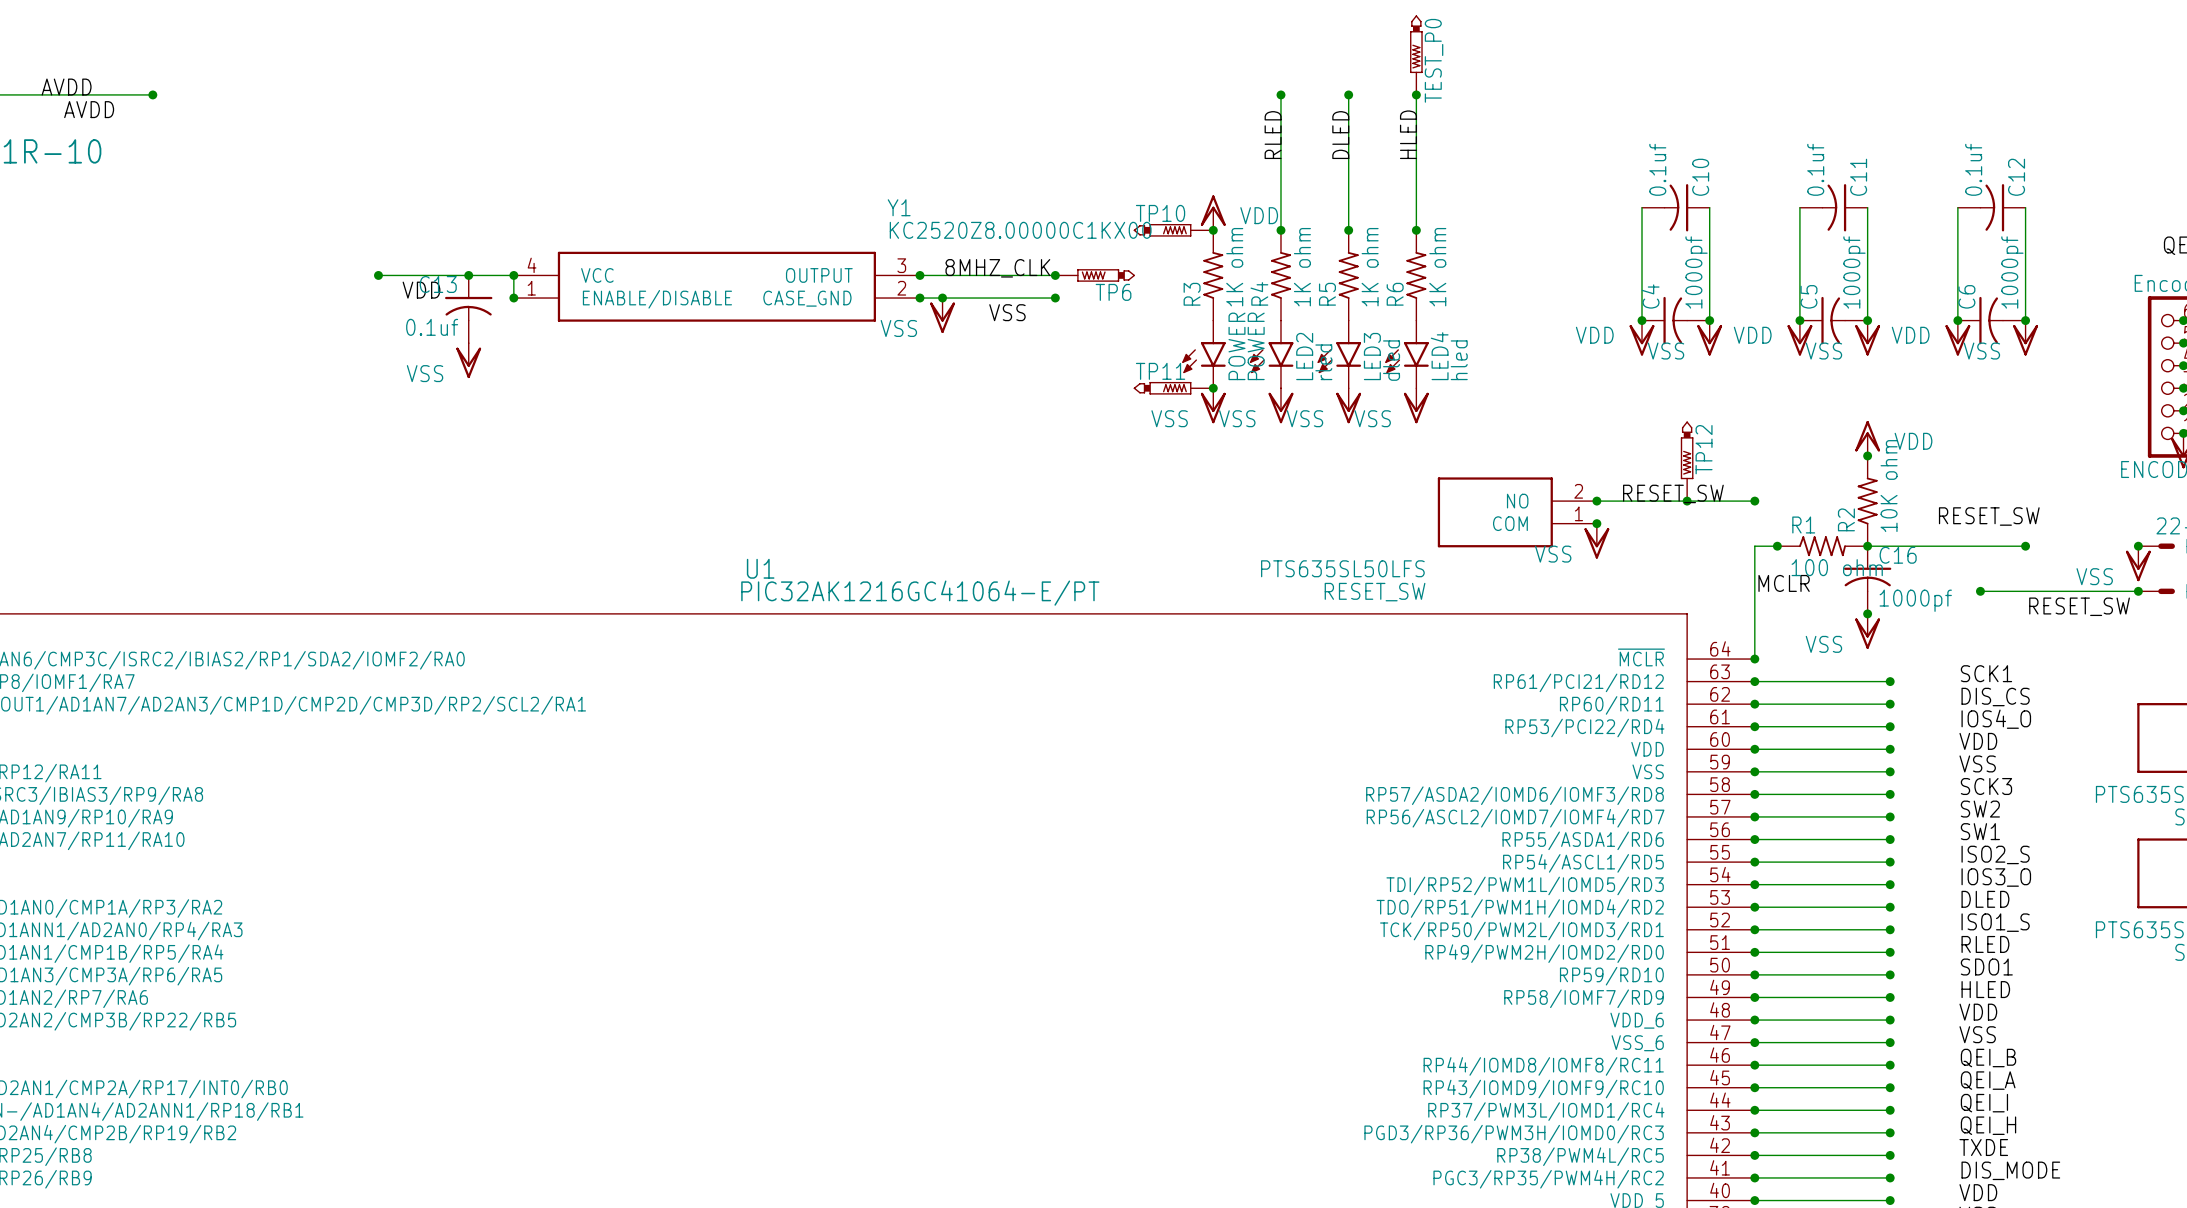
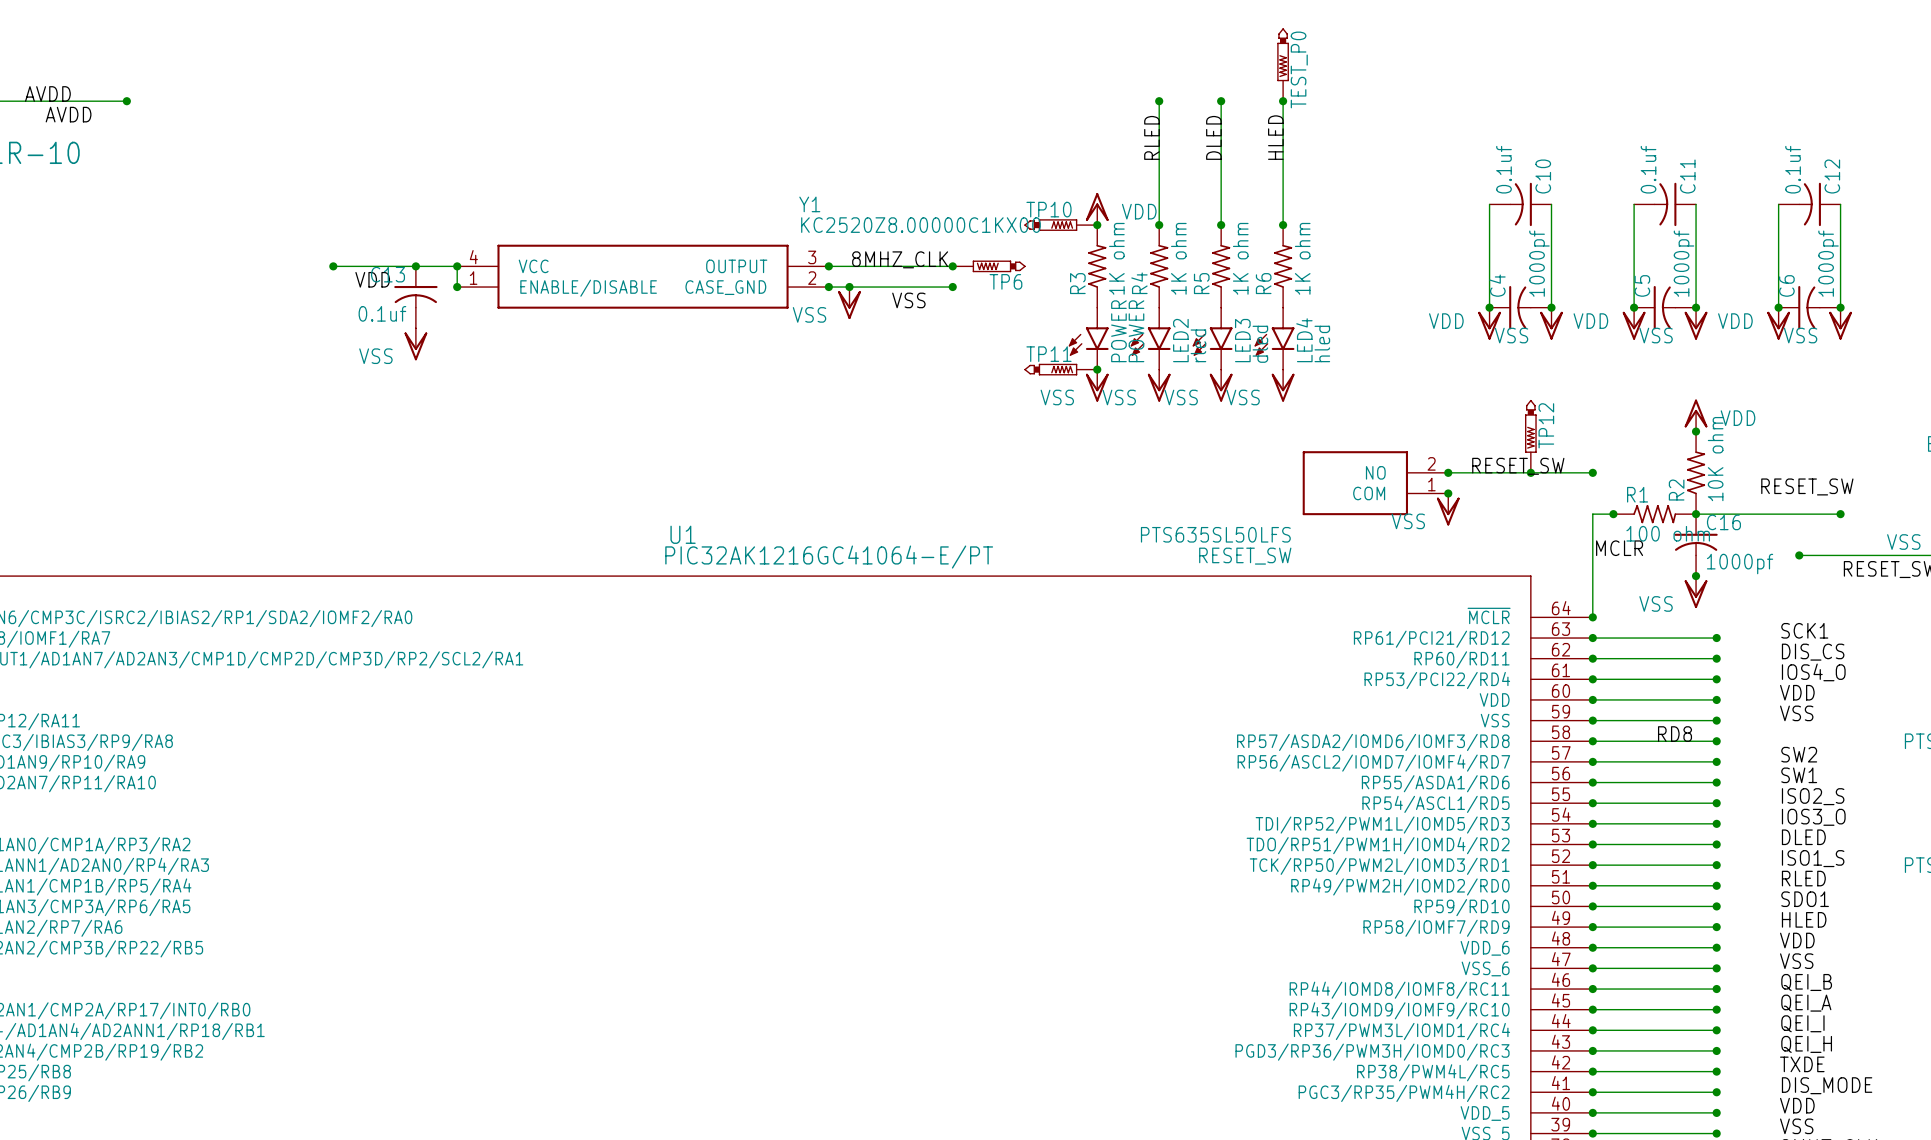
label: none -> RD8 (1675, 734)
label: SCK3 (1986, 786) -> none

